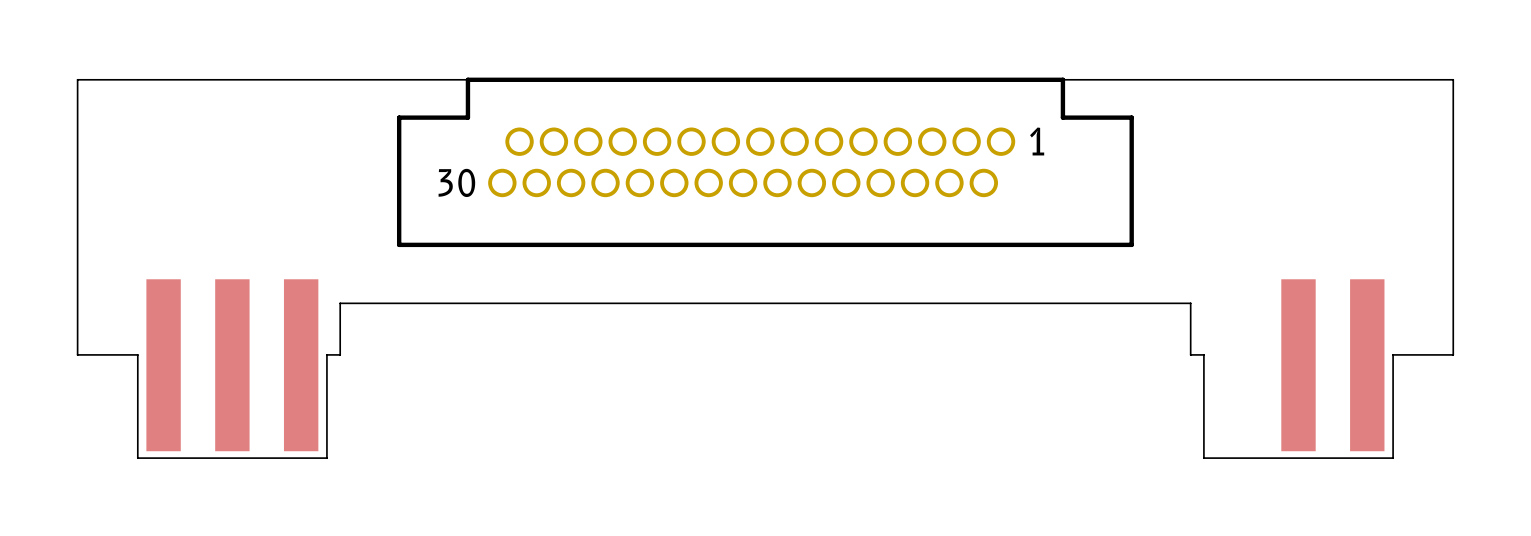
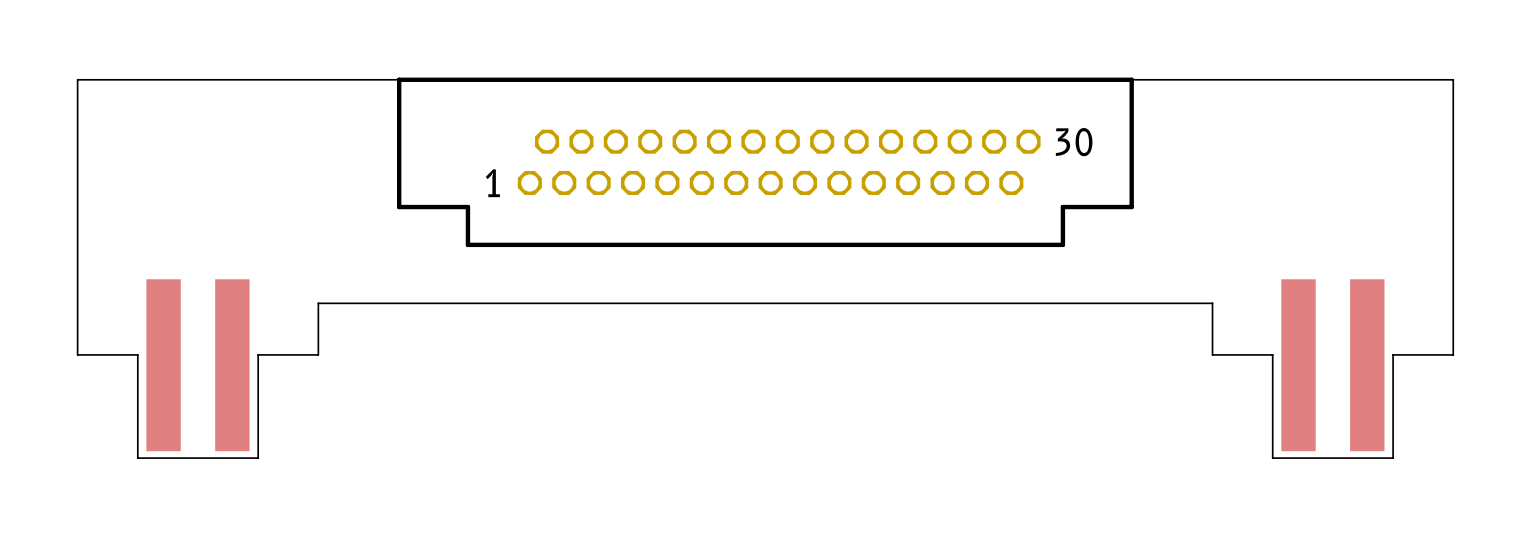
part footprint: [396, 77, 1134, 248] -> [396, 77, 1134, 248]
part footprint: [77, 79, 1454, 459] -> [77, 79, 1454, 459]

